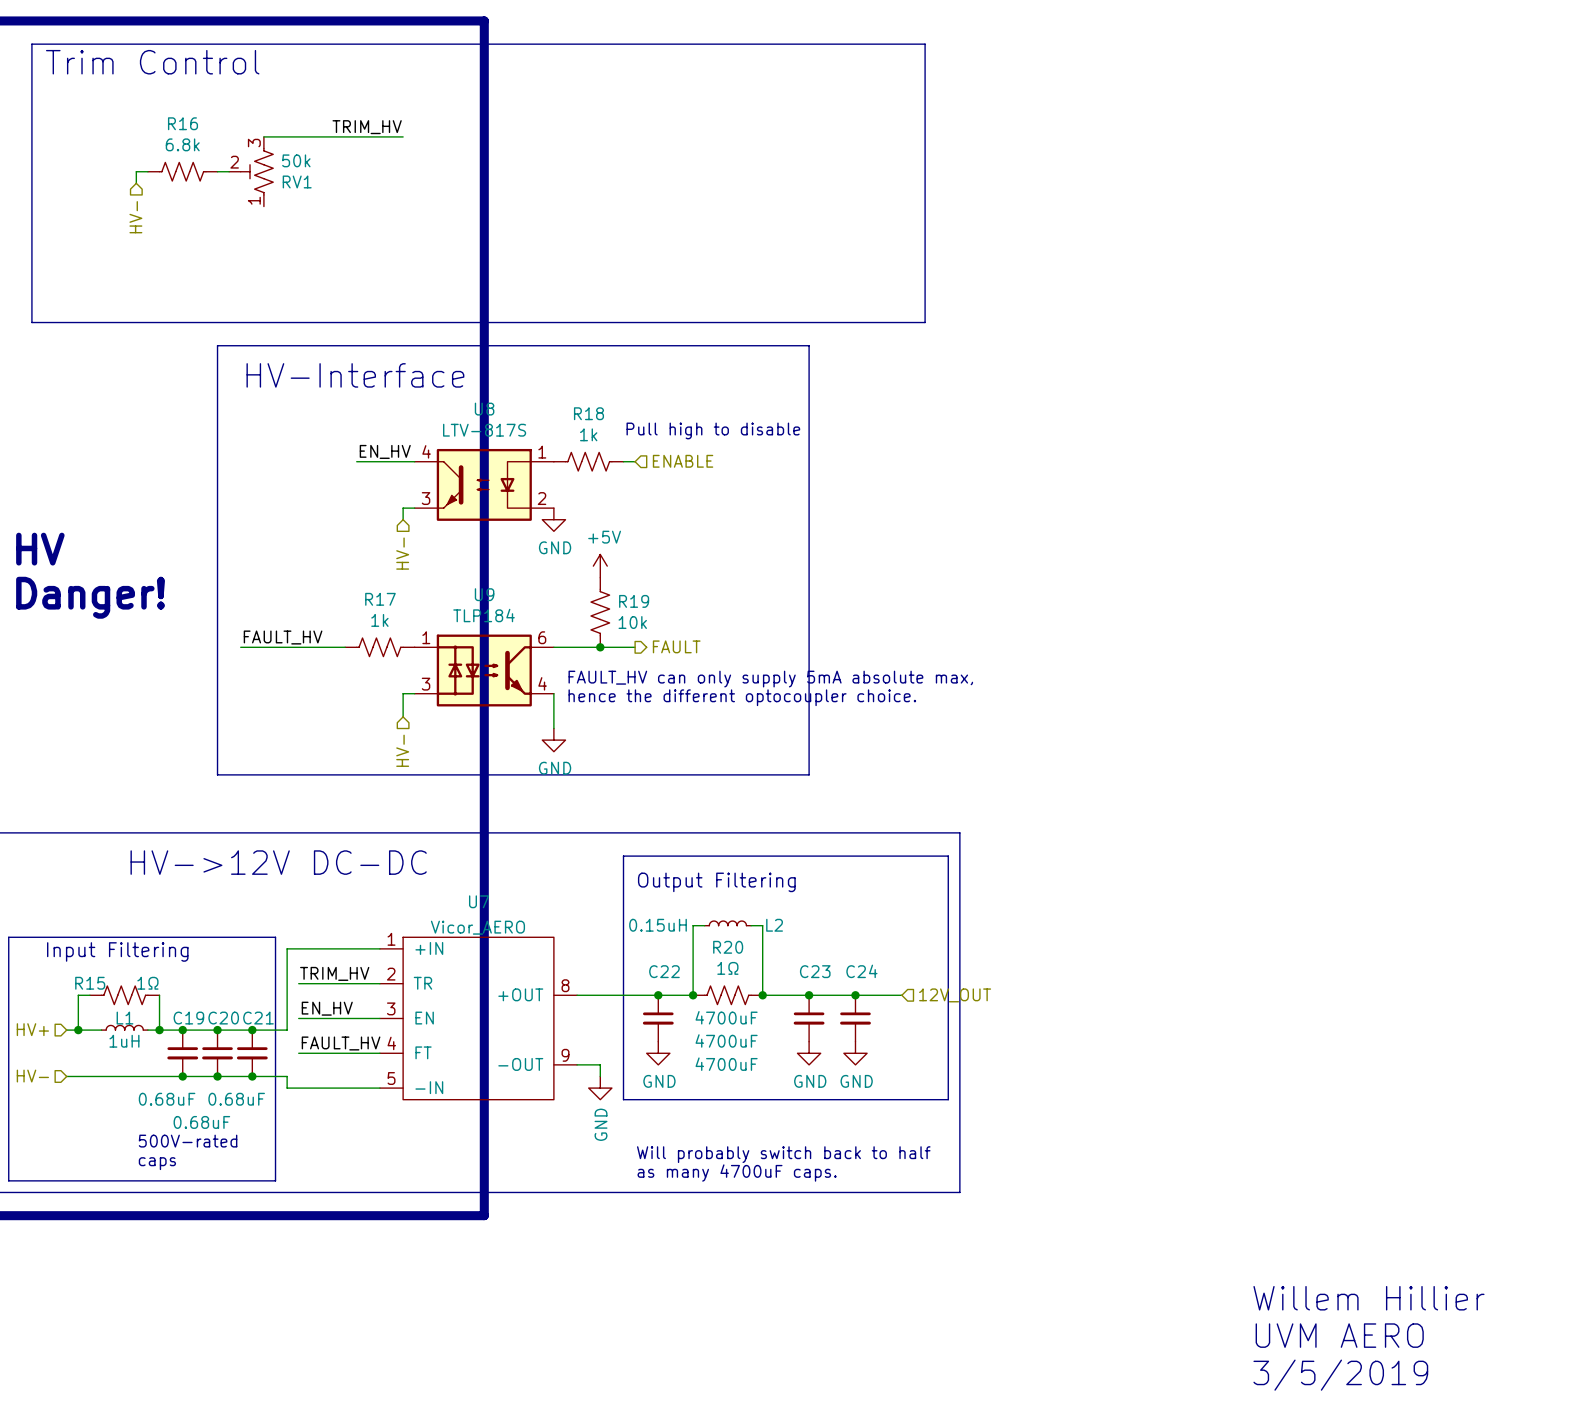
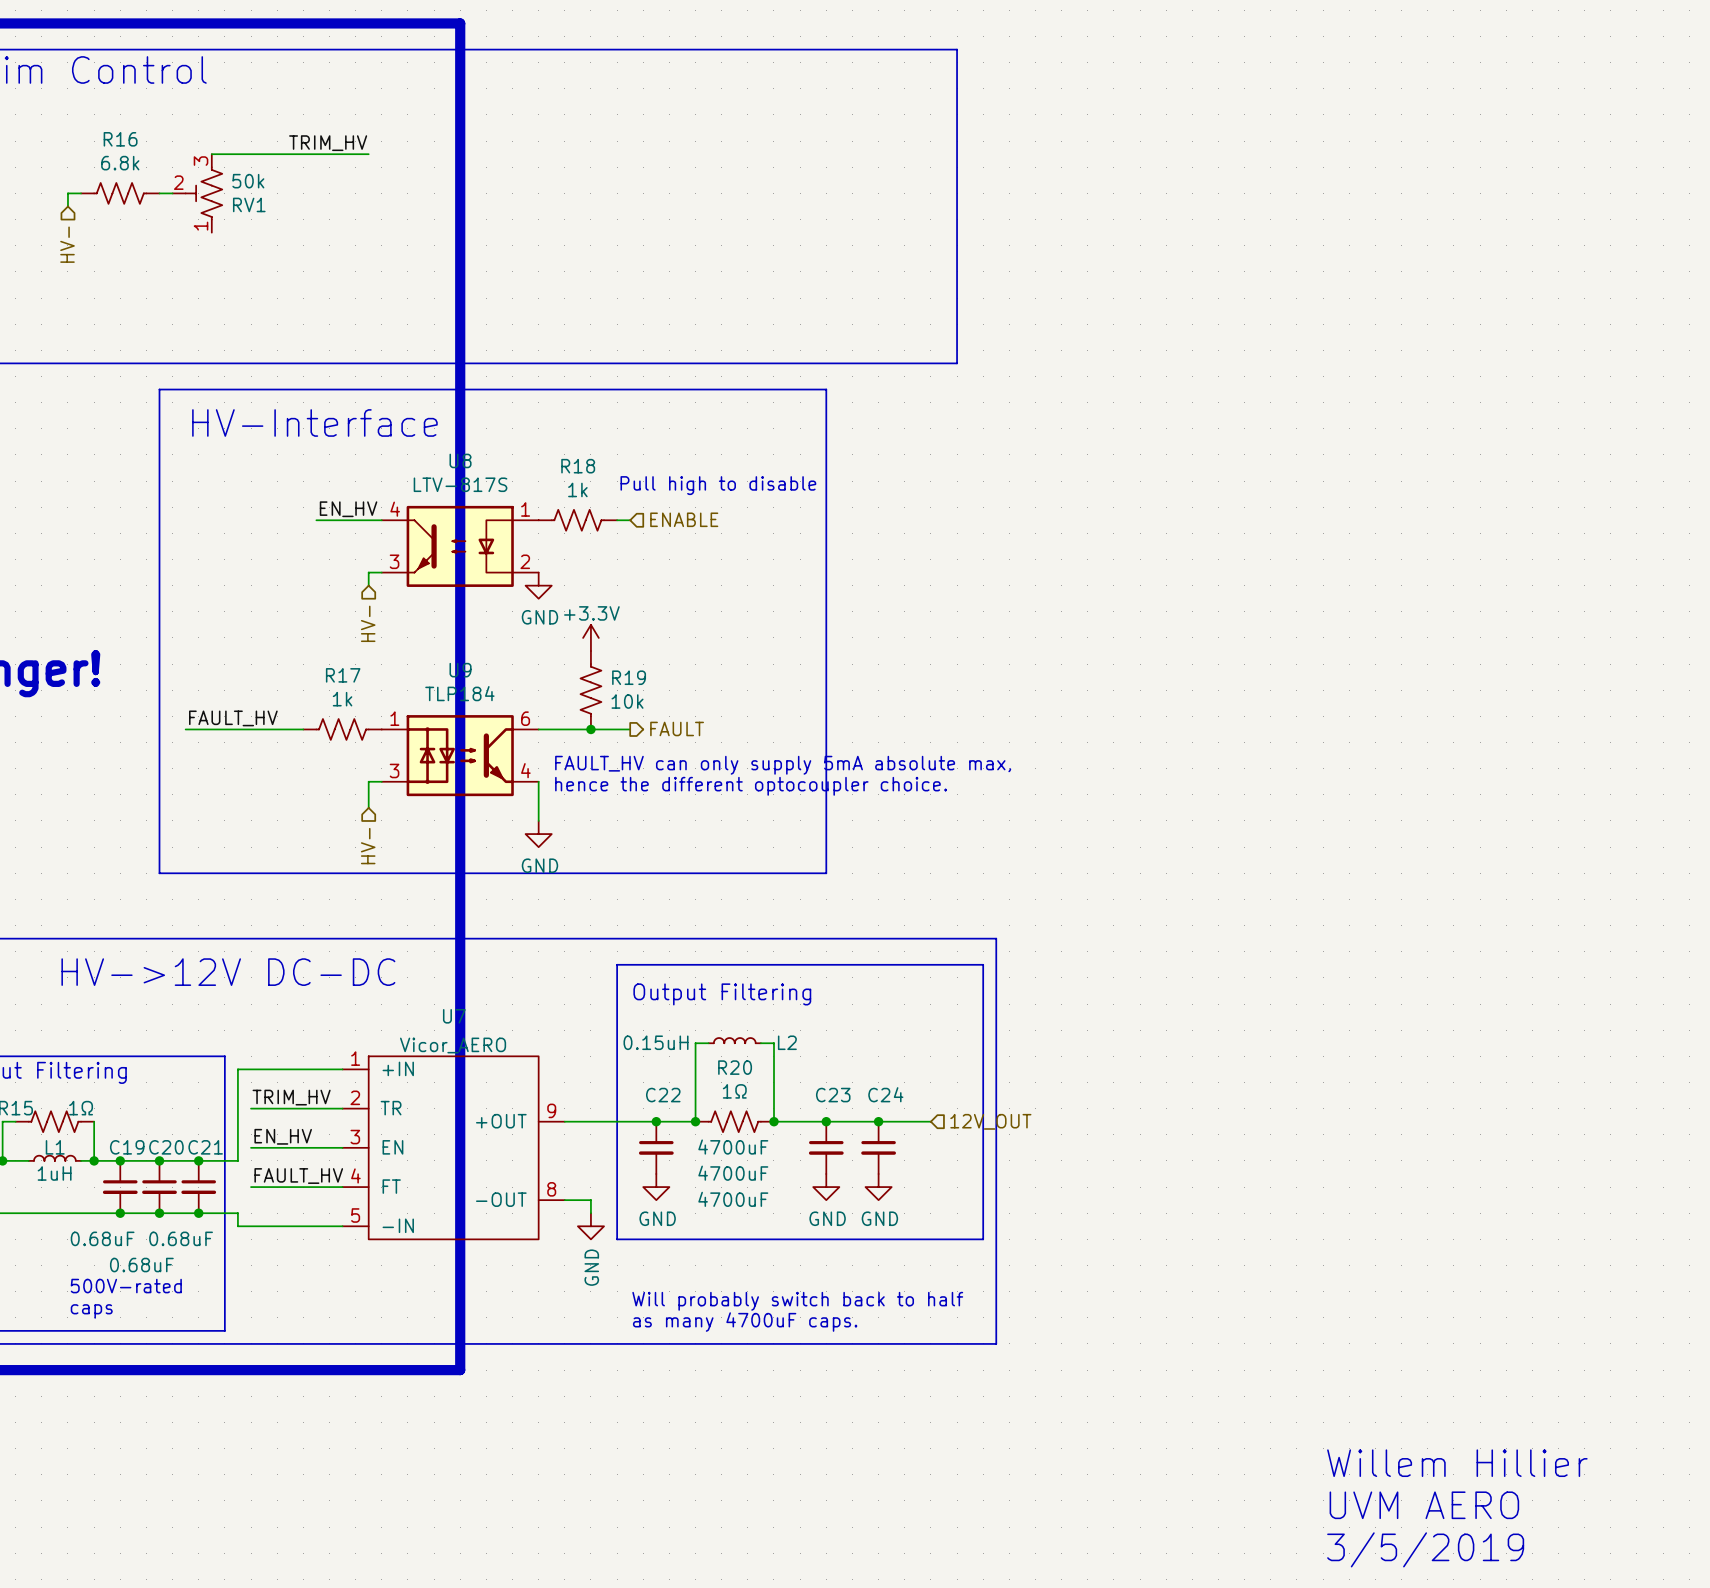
power symbol: +5V (600, 566) -> +3.3V (590, 637)
U7 pin number: 8 (565, 985) -> 9 (551, 1110)
U7 pin number: 9 (565, 1055) -> 8 (551, 1189)

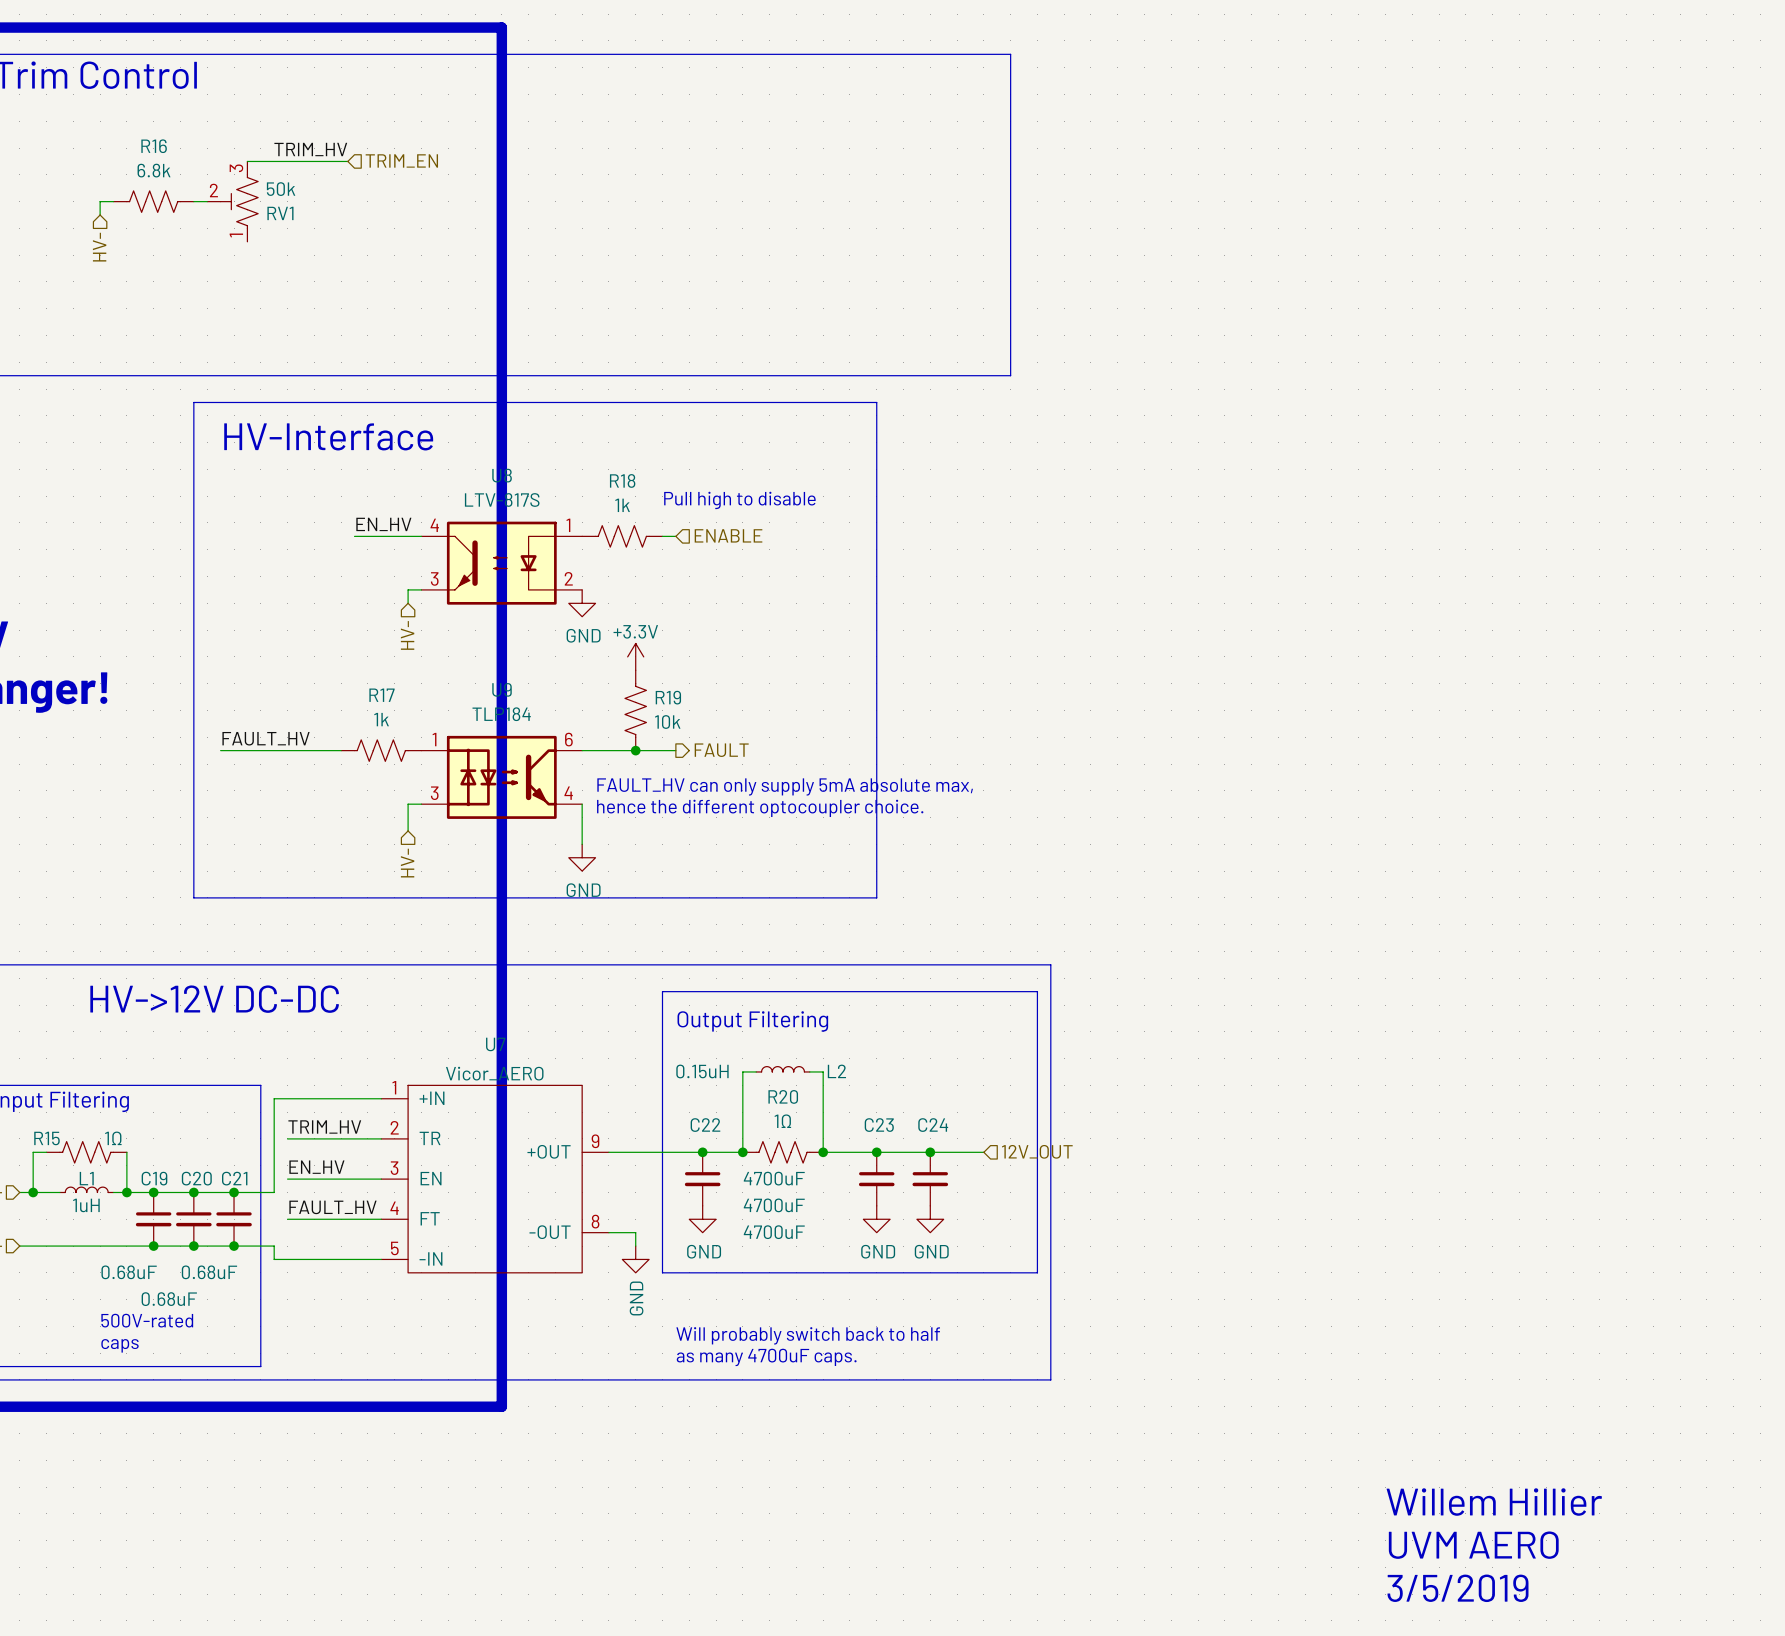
label position: TRIM_HV (328, 143) -> TRIM_HV (310, 149)
wire: (309, 154) (368, 154) -> none
hierarchical label: none -> TRIM_EN (401, 160)

